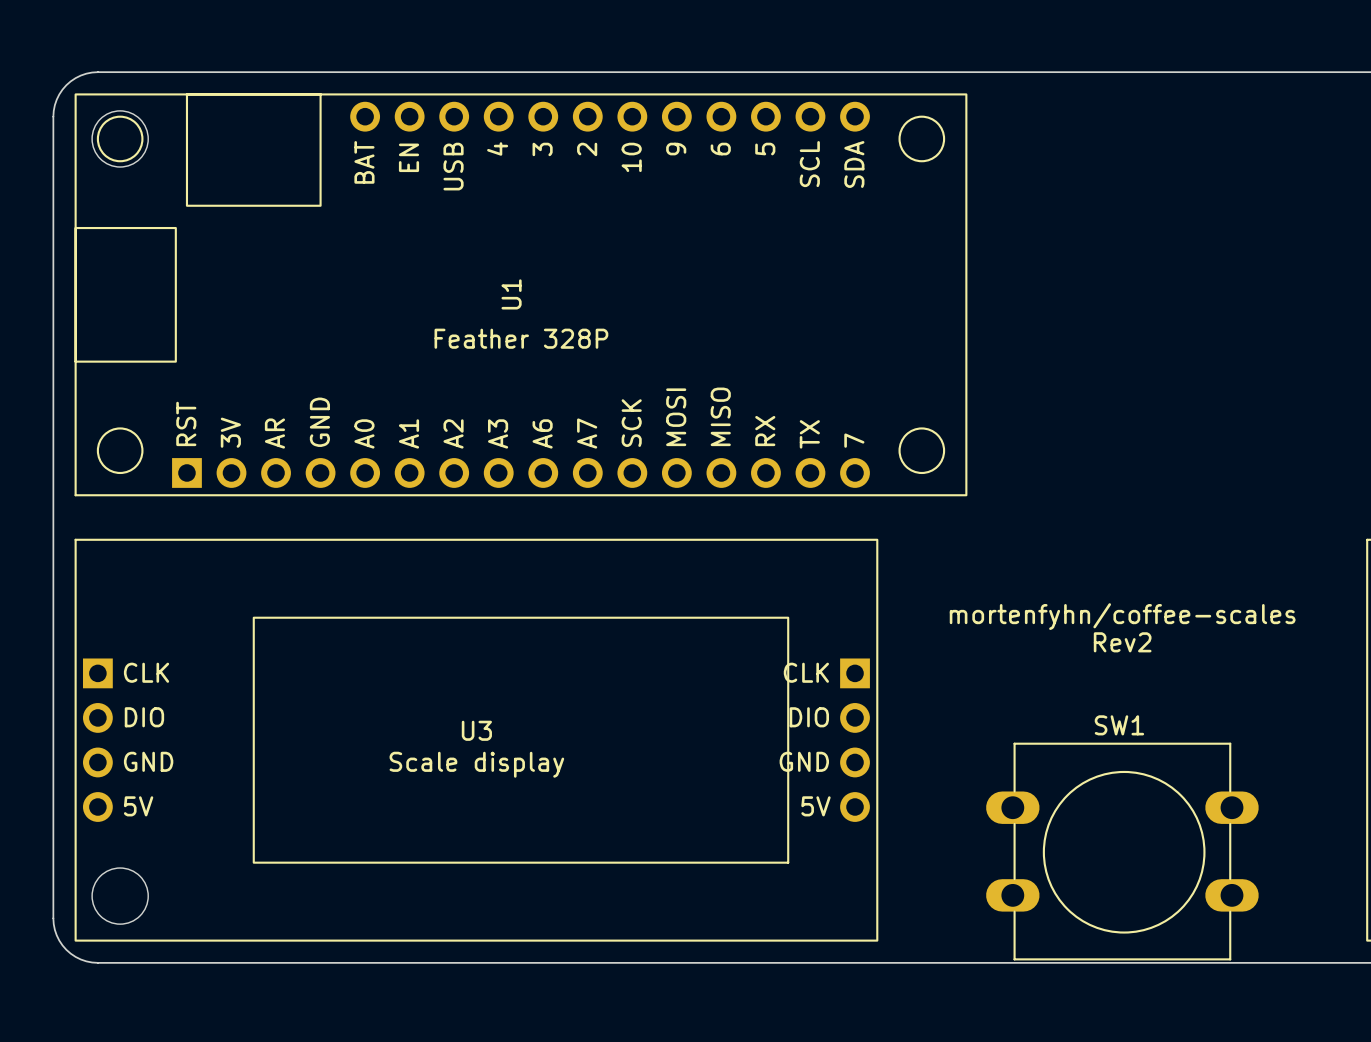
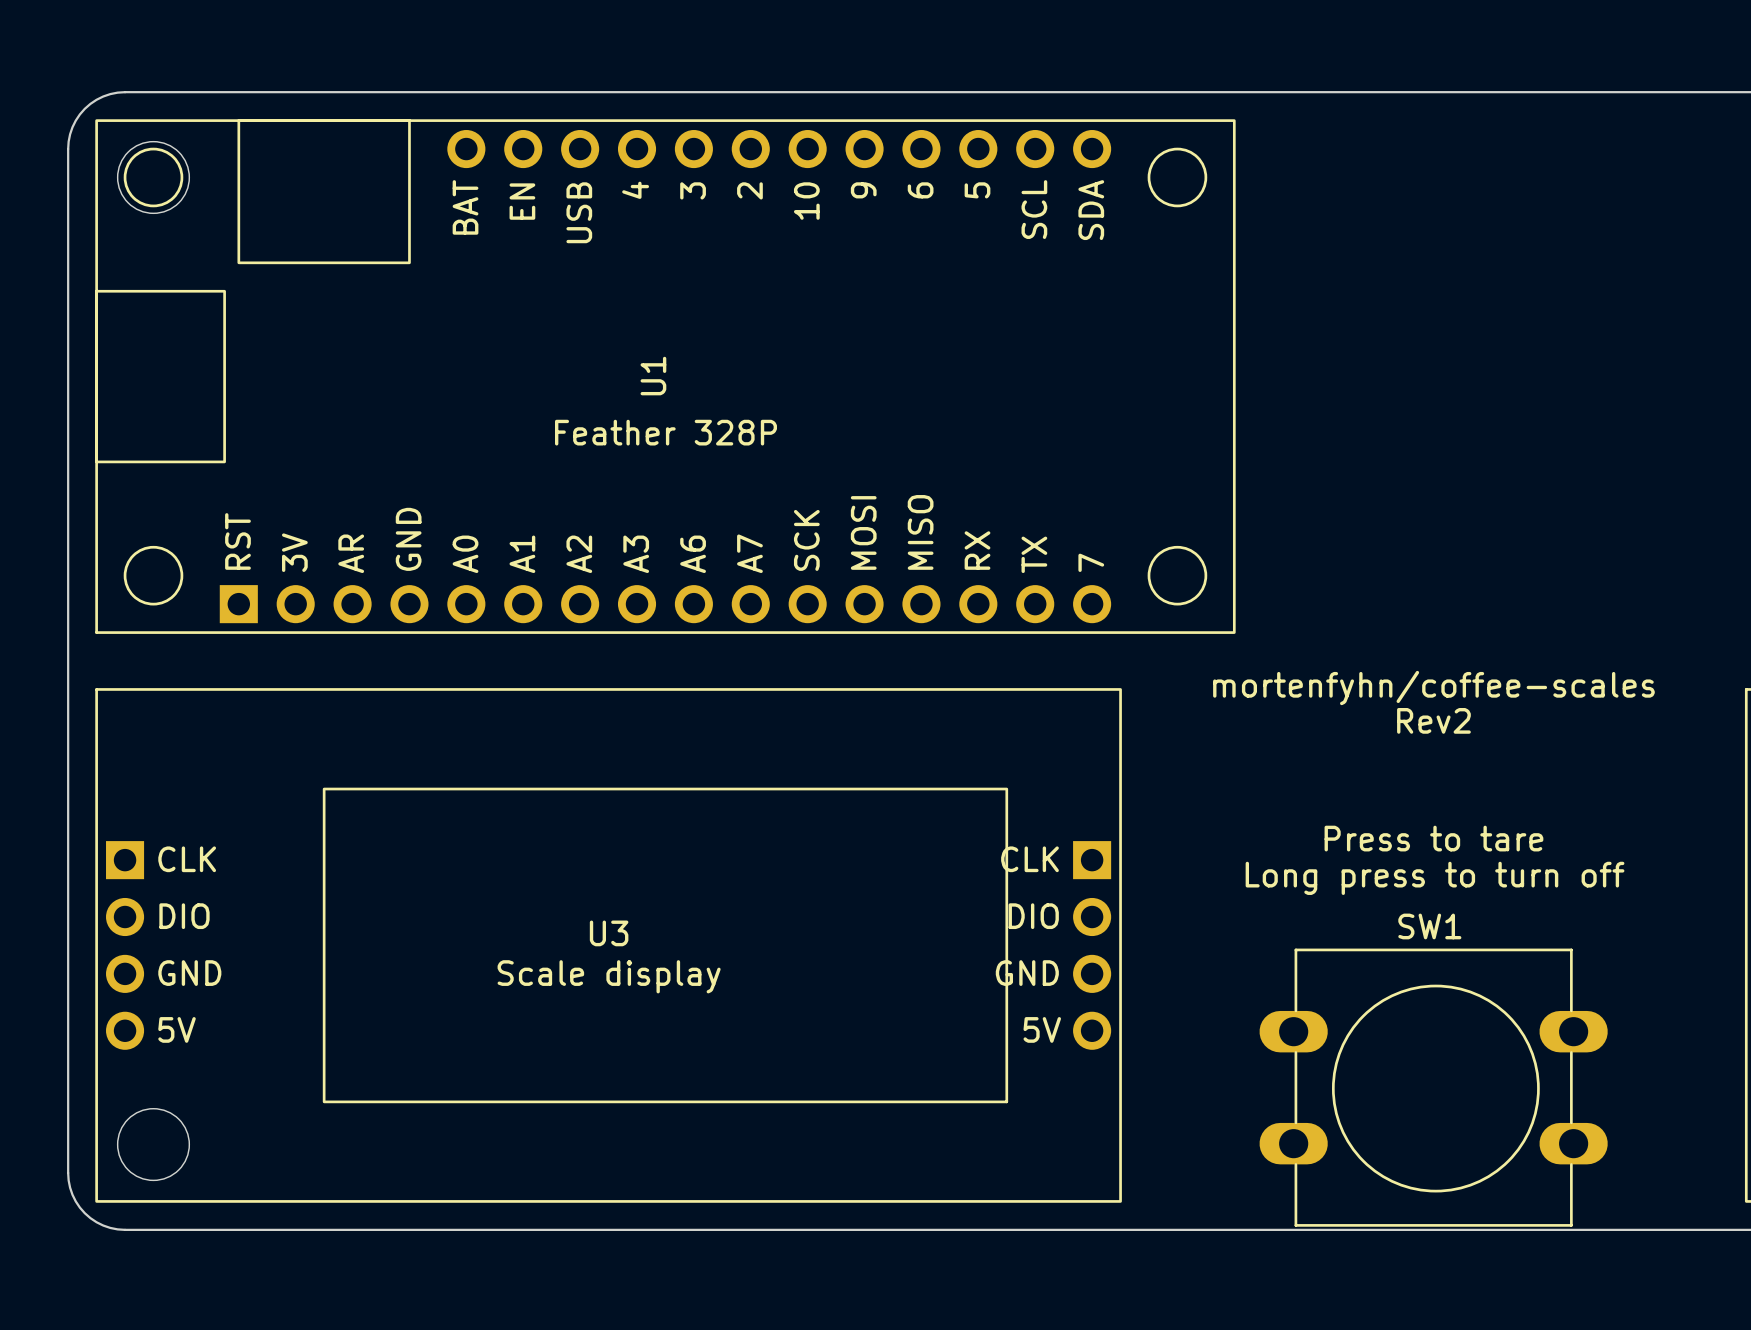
text position: mortenfyhn/coffee-scales (1122, 616) -> mortenfyhn/coffee-scales (1433, 688)
text position: Rev2 (1122, 642) -> Rev2 (1433, 720)
text: none -> Press to tare (1433, 838)
text: none -> Long press to turn off (1435, 878)

